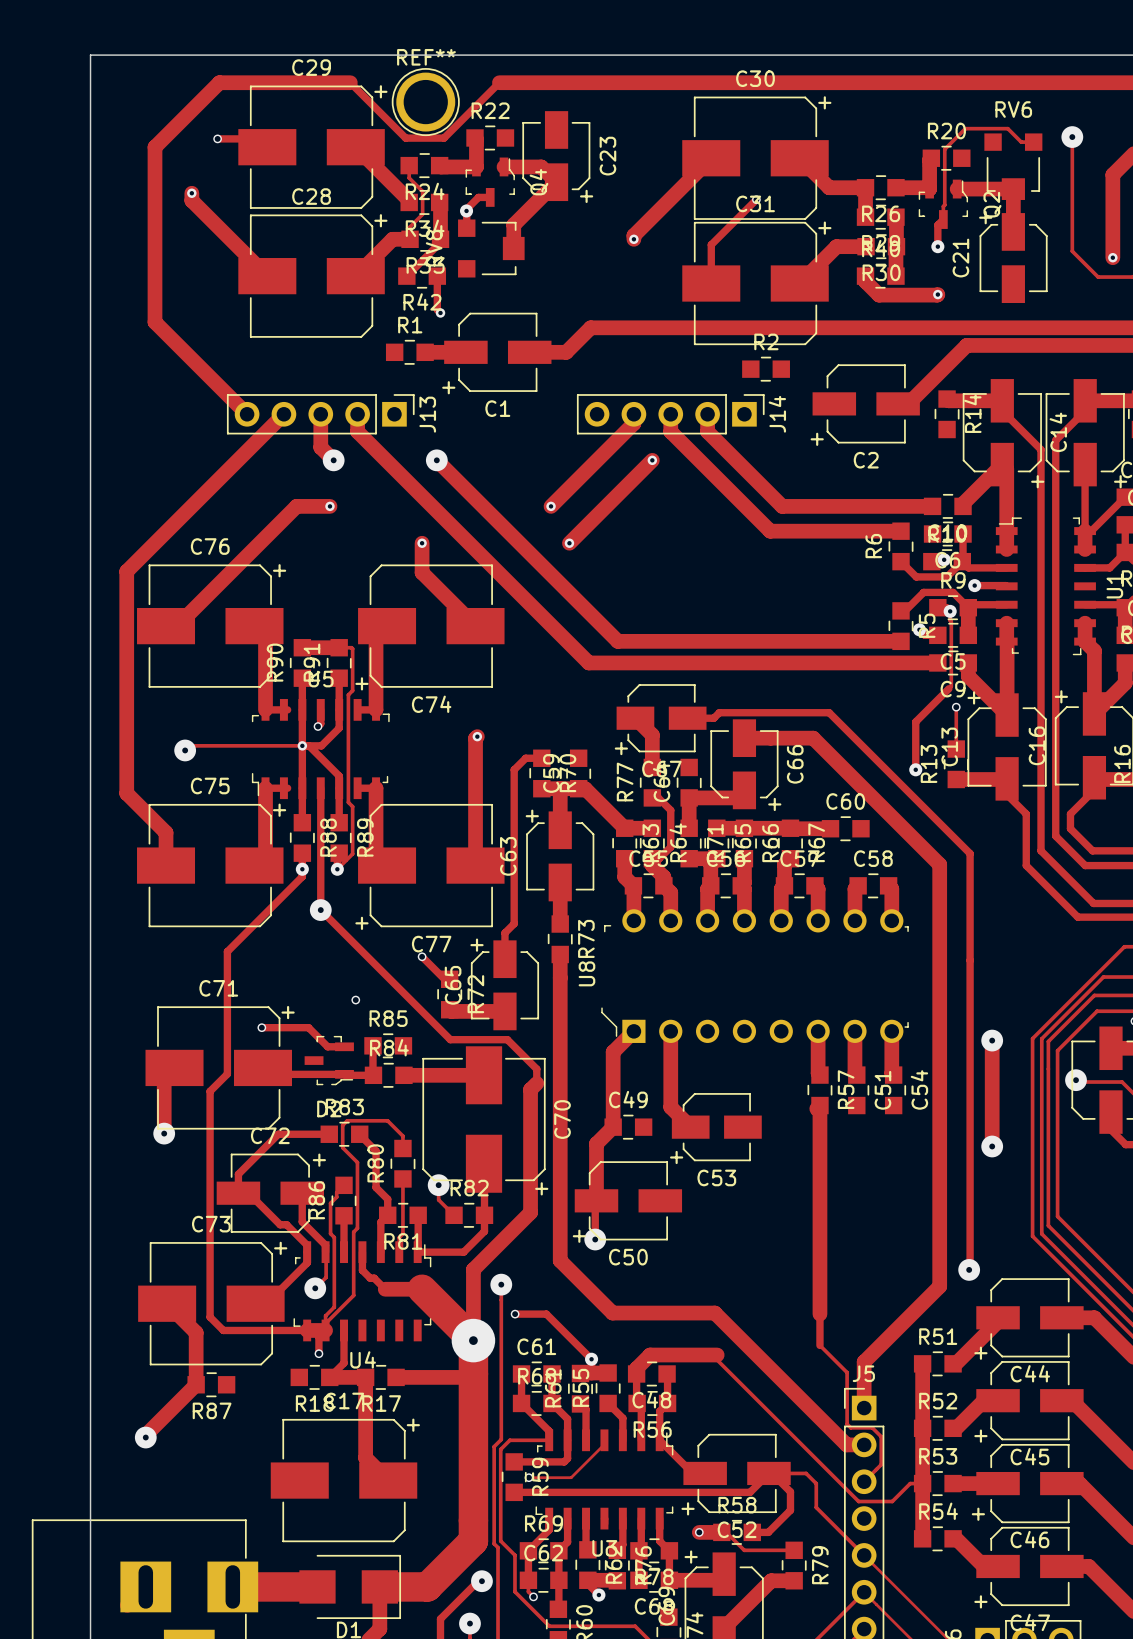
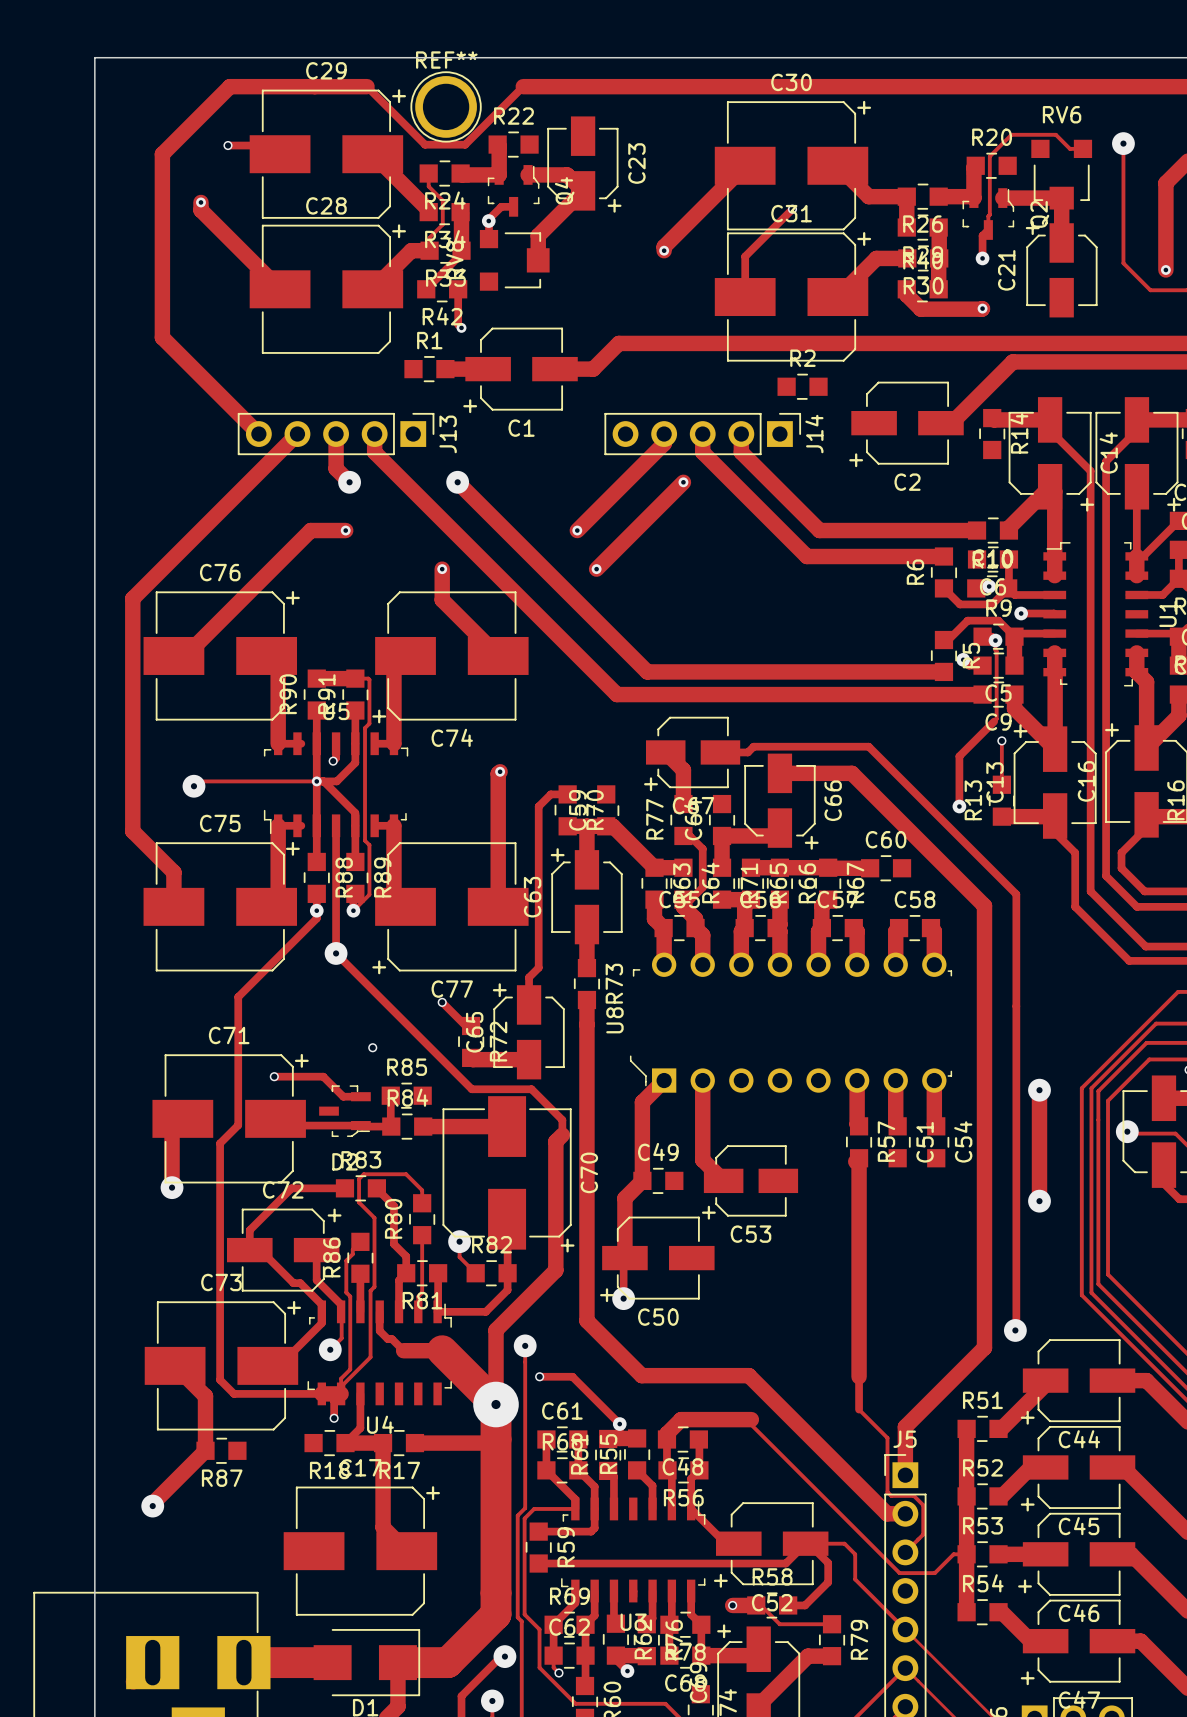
track: (604, 1440) (604, 1444) (571, 1477) (528, 1477) -> none
via: (528, 1477) -> none

